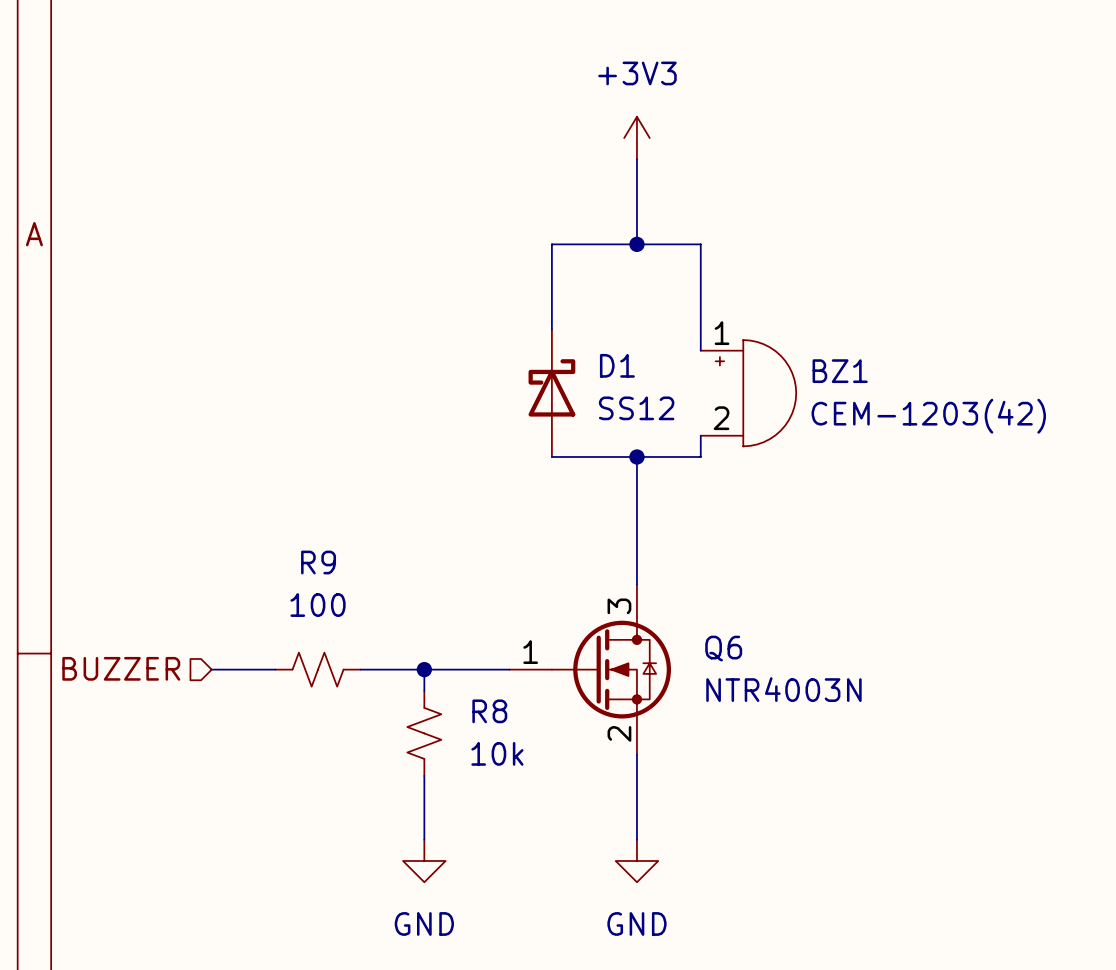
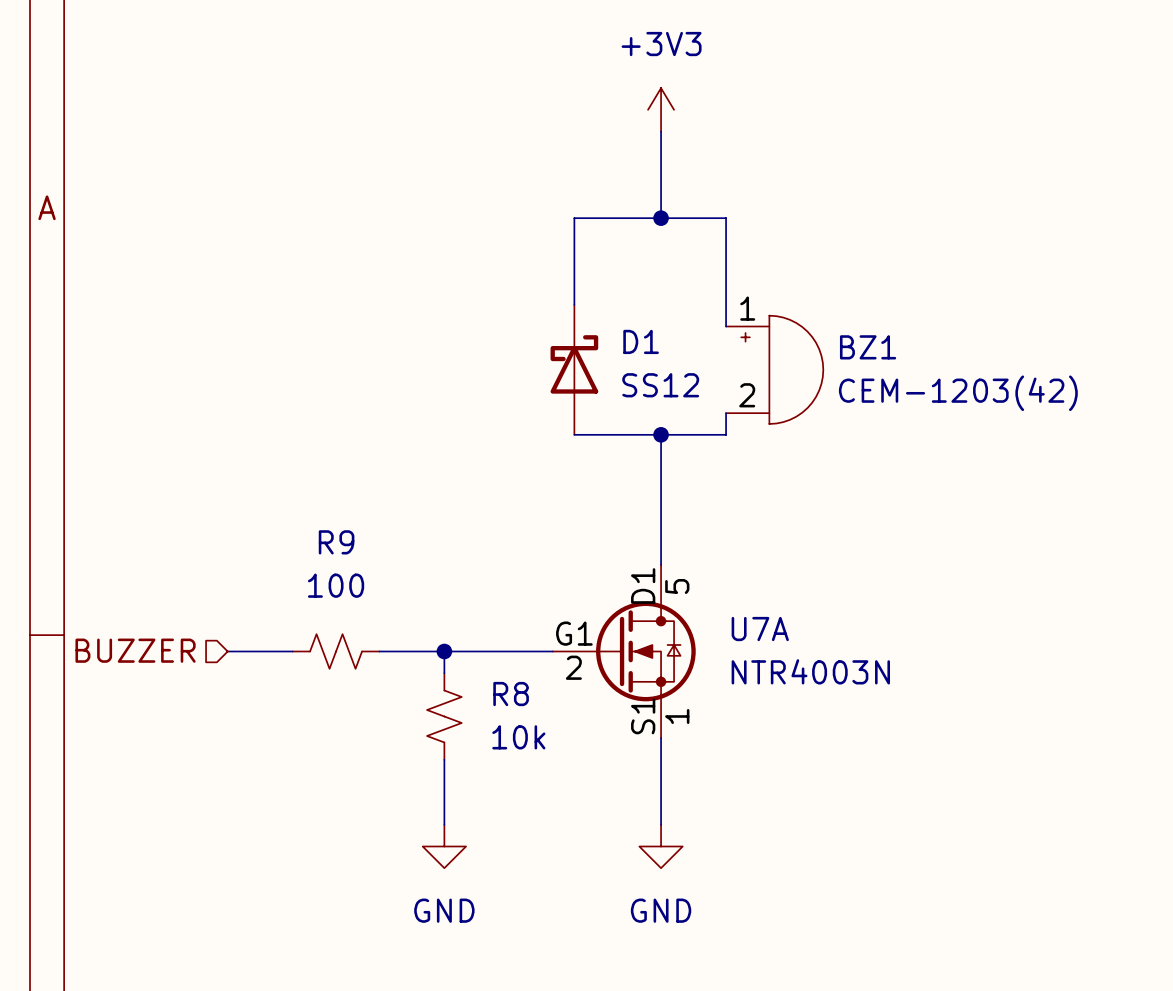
Q6: NTR4003N (590, 669) -> none
U7A: none -> NTR4003N (624, 651)

